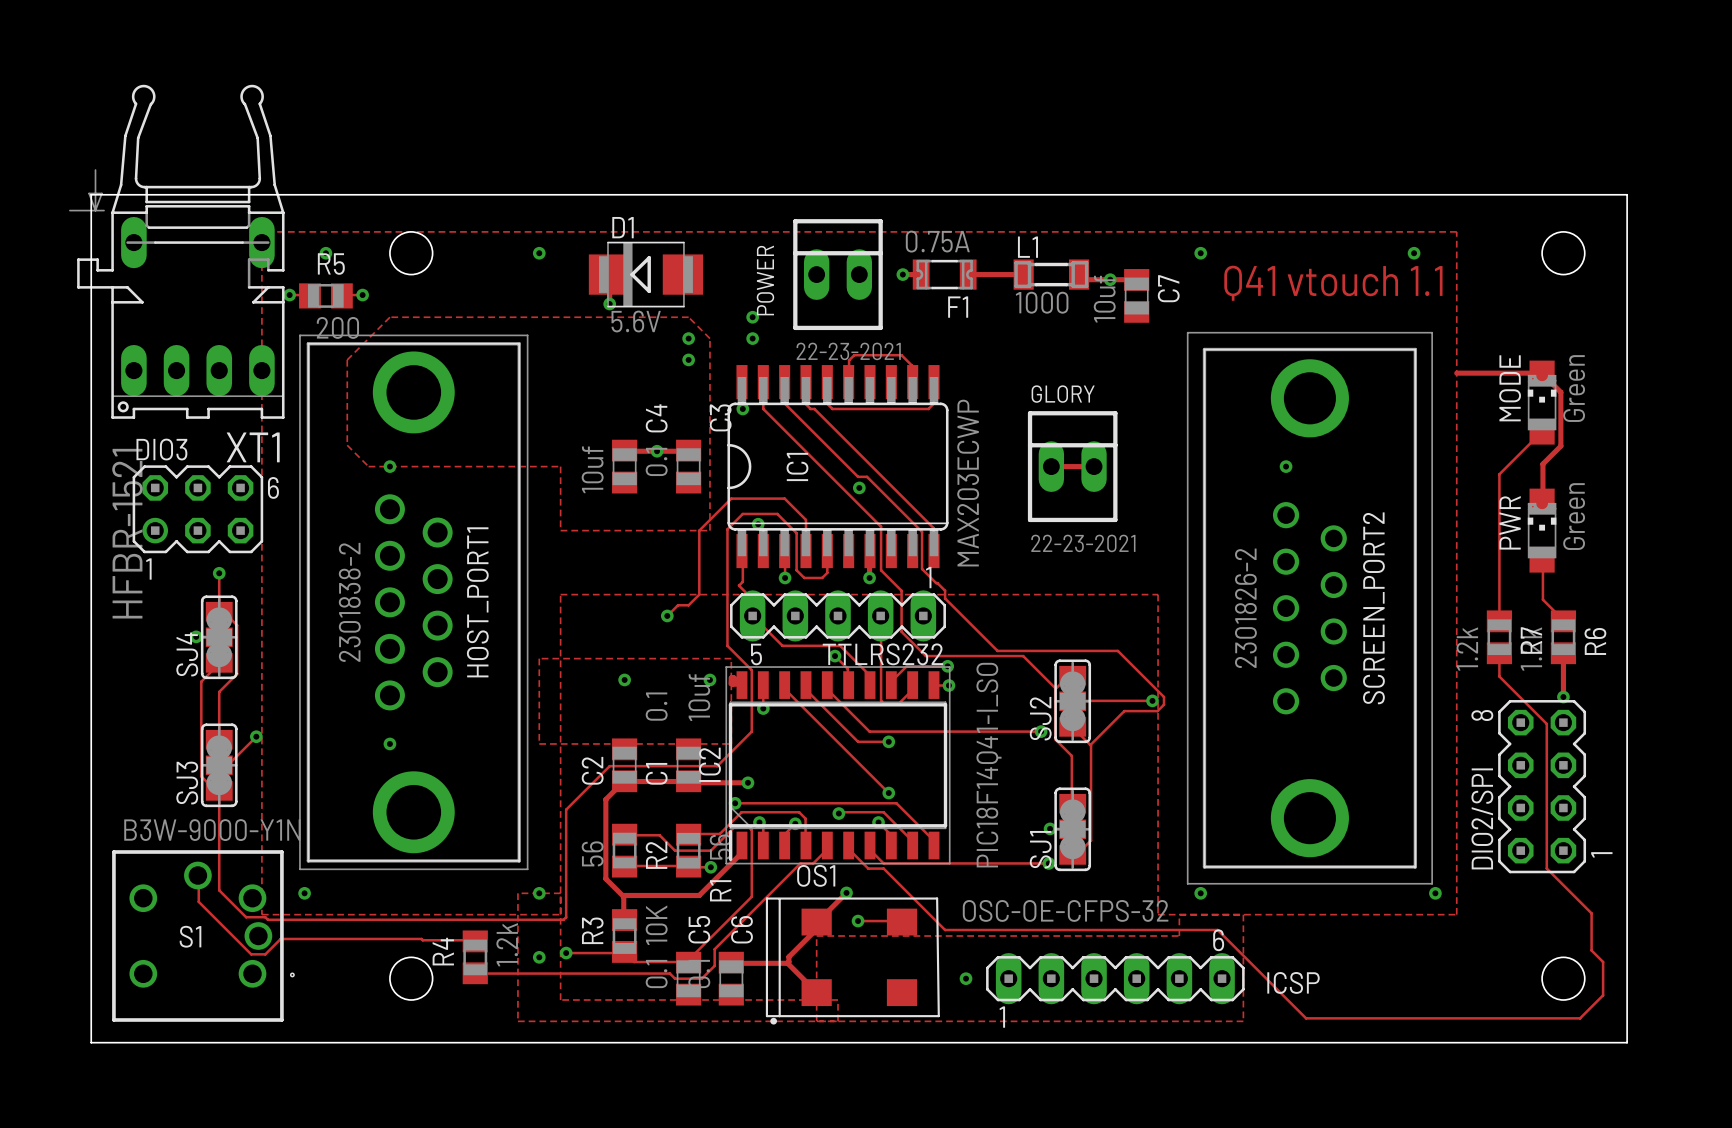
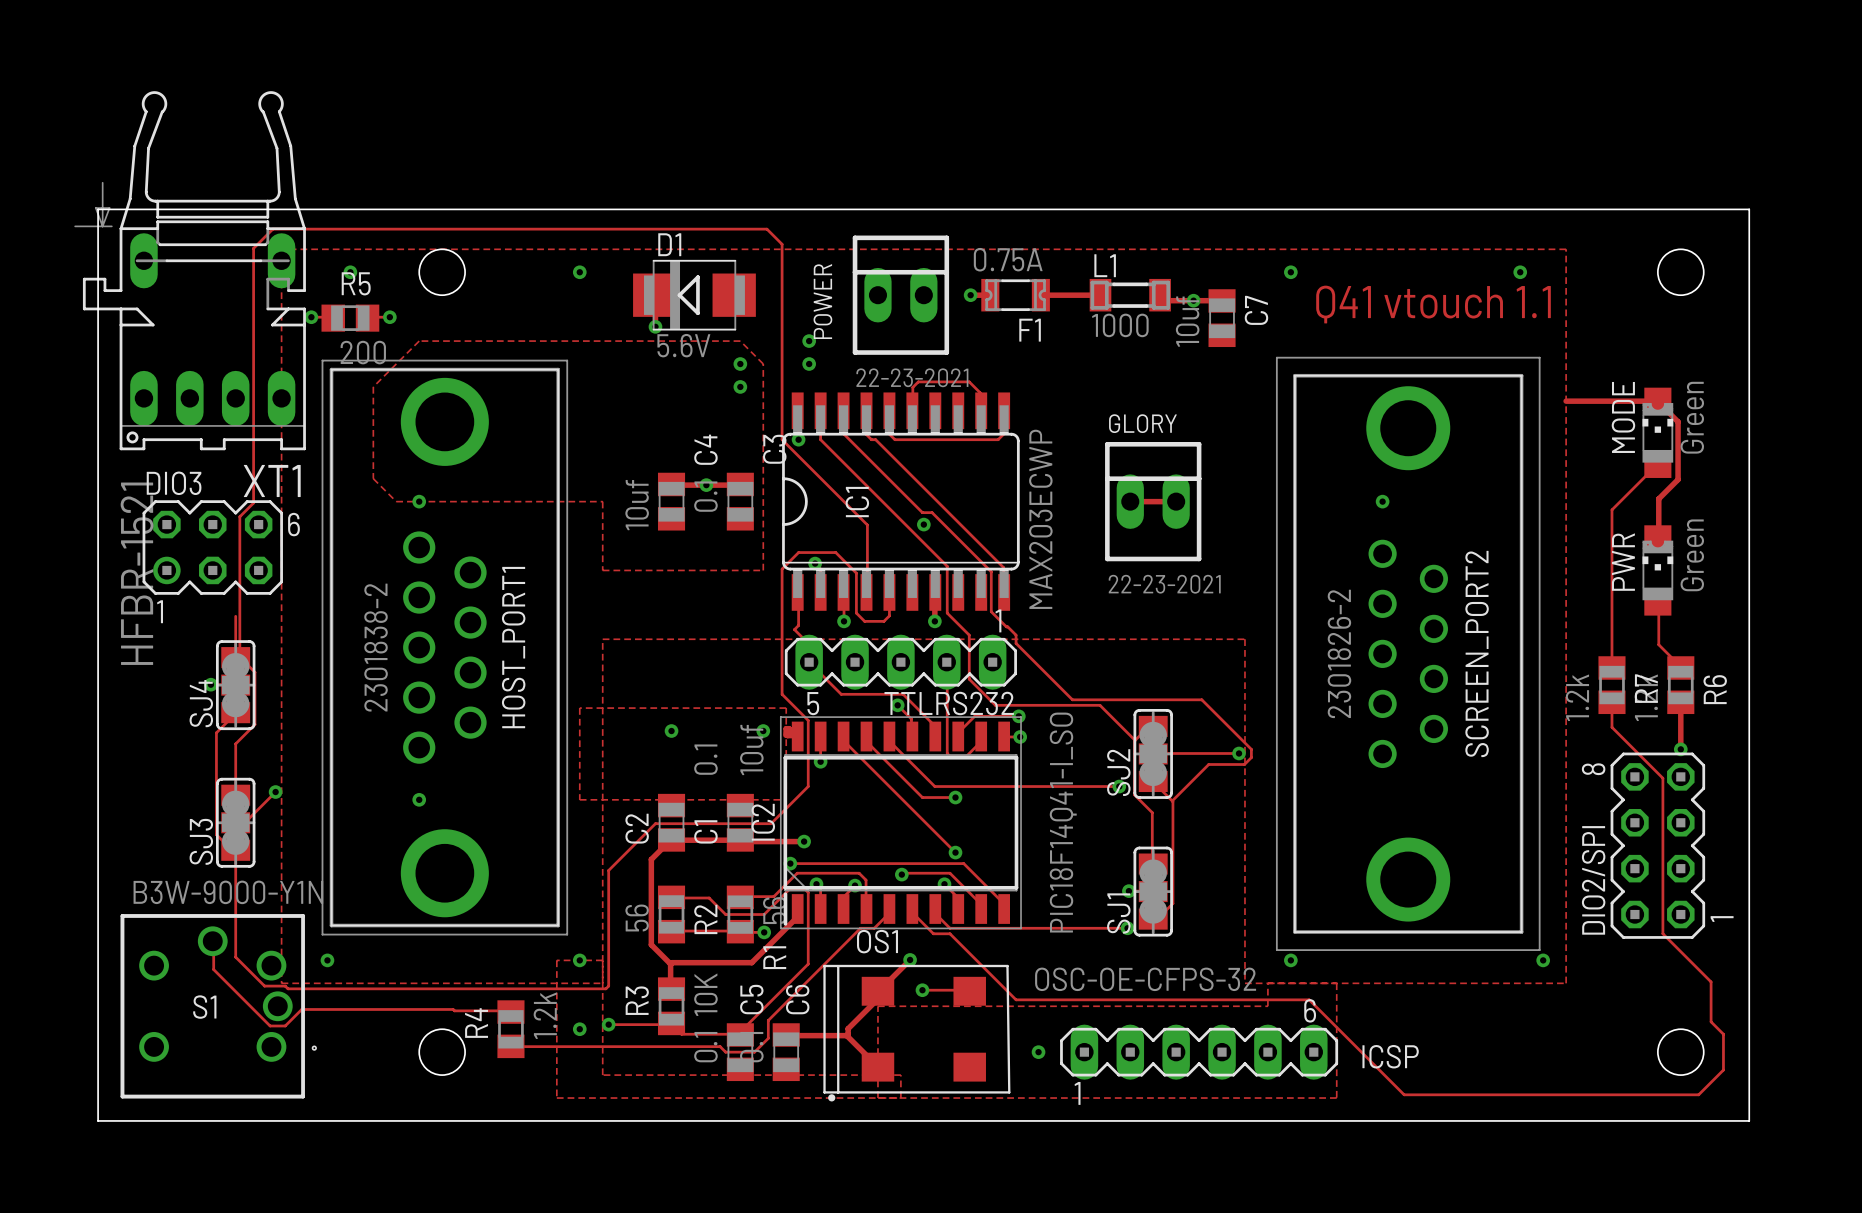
track: (805, 551) (805, 519) (784, 498) (731, 498) (699, 530) (699, 594) (688, 605) (677, 605) (667, 615) -> (866, 592) (867, 525) (782, 439) (782, 244) (766, 229) (272, 229) (253, 248) (253, 503) (239, 516) (239, 658)
via: (219, 573) -> none
via: (667, 615) -> none

